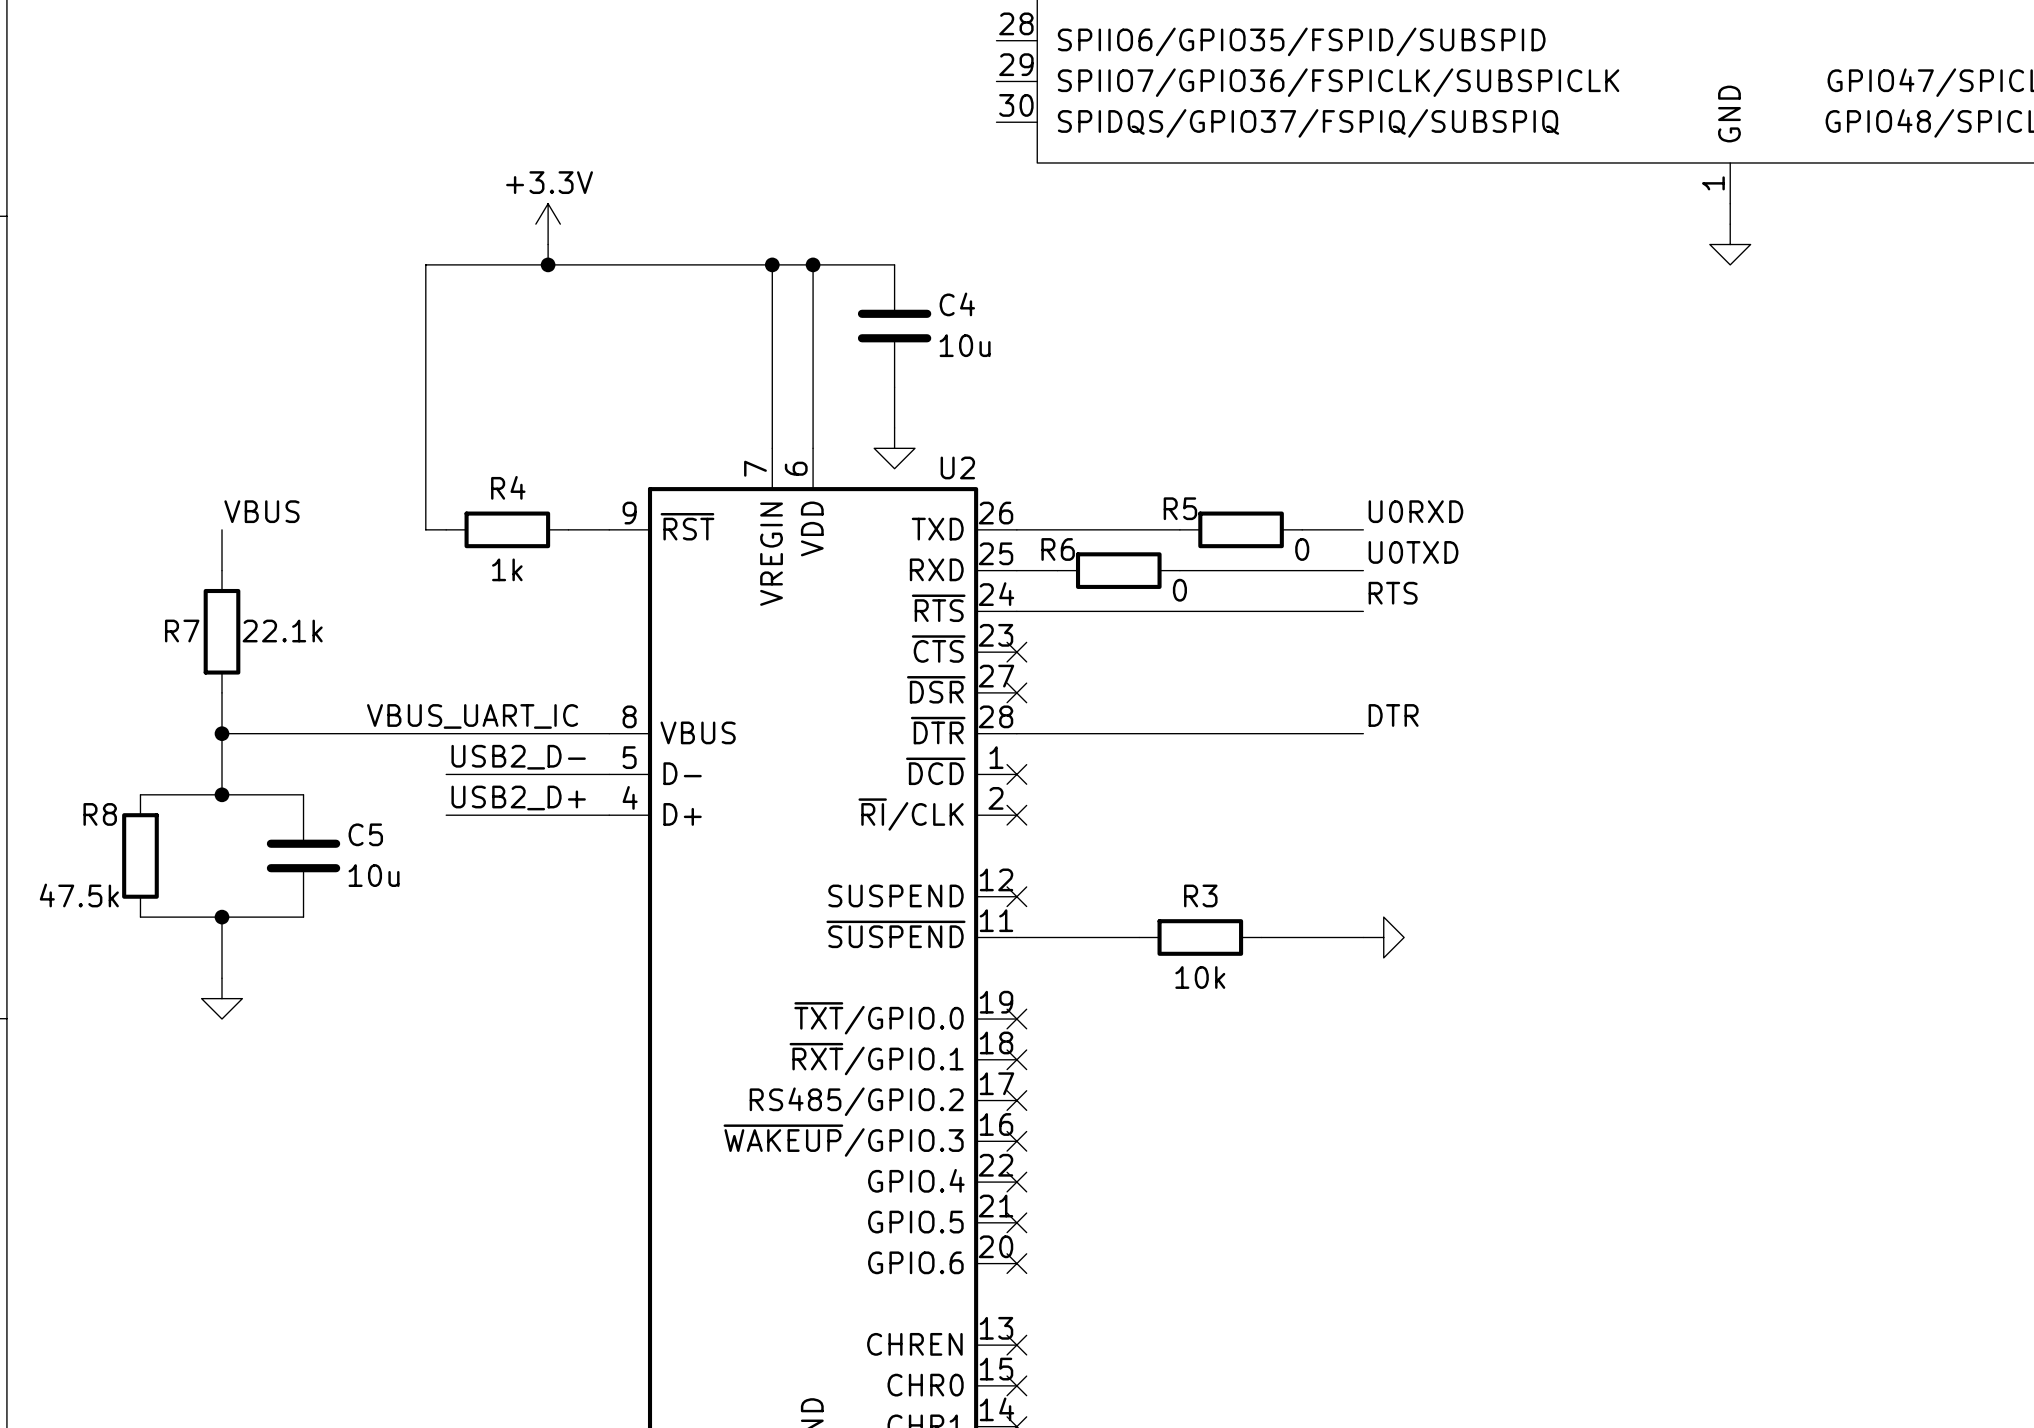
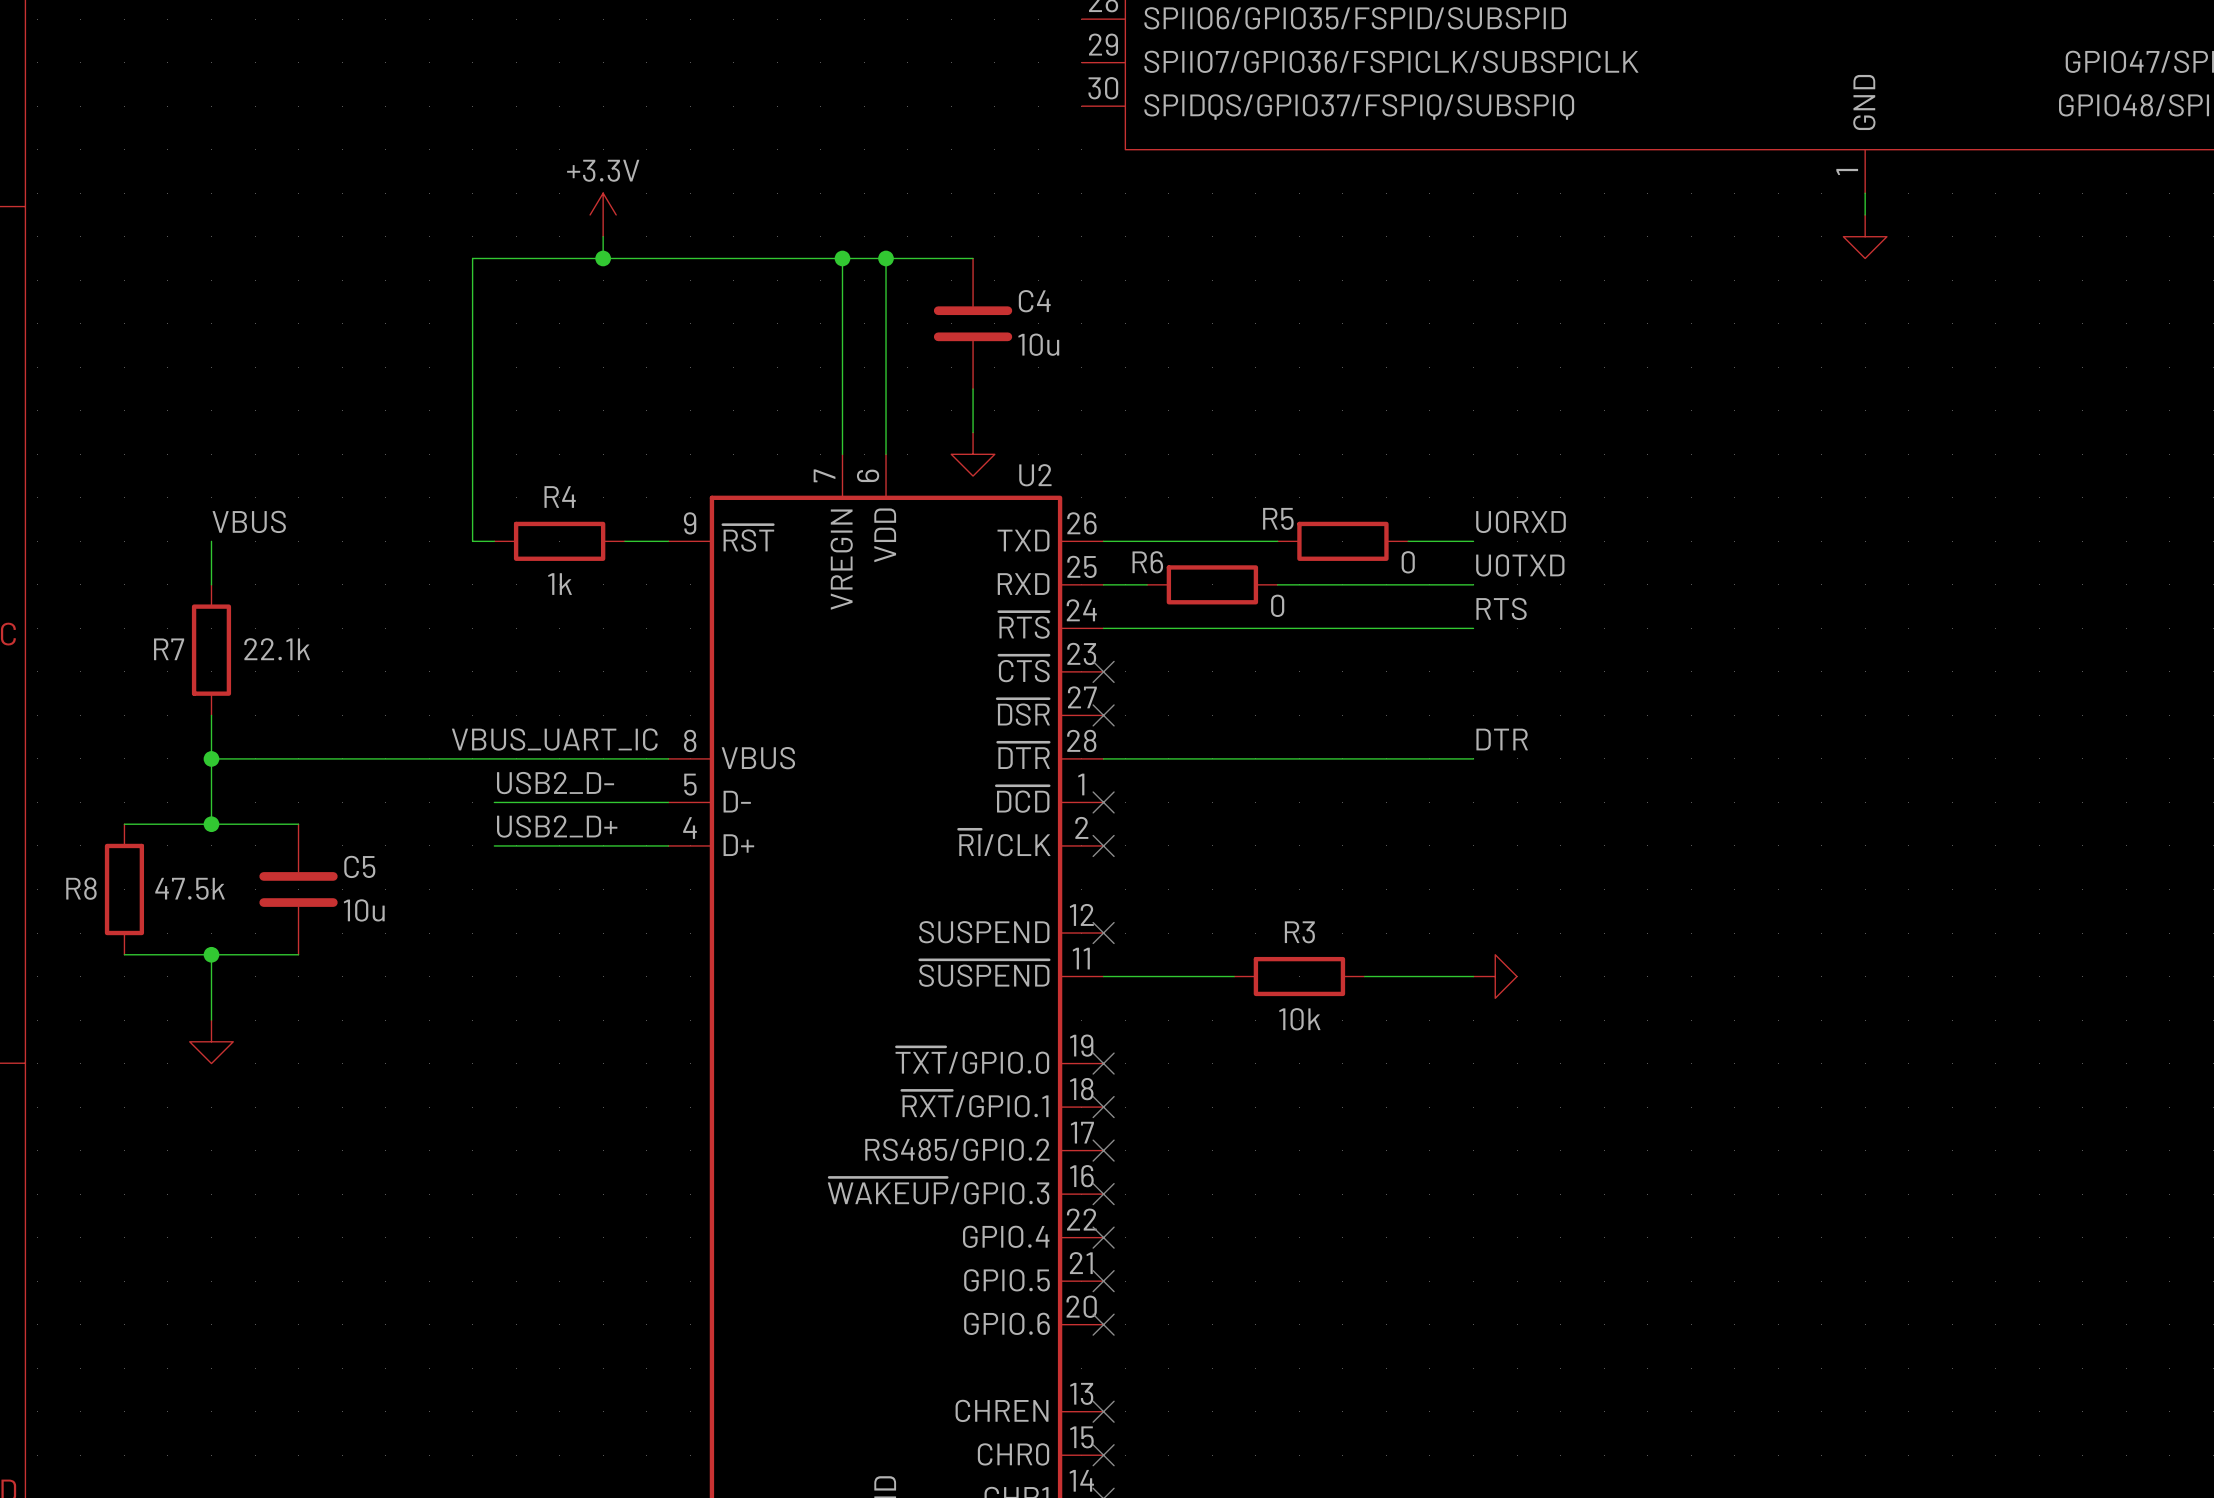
label position: VBUS (261, 511) -> VBUS (249, 521)
wire: (221, 529) (221, 570) -> (211, 541) (211, 584)
R7 position: (221, 631) -> (211, 650)
wire: (221, 692) (221, 794) -> (211, 715) (211, 824)
label position: VBUS_UART_IC (472, 716) -> VBUS_UART_IC (554, 739)
wire: none -> (211, 758) (255, 758)
junction: none -> (211, 758)
junction: (221, 733) -> none
junction: none -> (211, 824)
junction: (221, 794) -> none
wire: (262, 794) (303, 794) -> (124, 824) (167, 824)
R8 name position: R8 (100, 814) -> R8 (81, 888)
R8 position: (140, 855) -> (124, 889)
C5 position: (303, 855) -> (298, 889)
R8 value position: 47.5k (79, 895) -> 47.5k (190, 888)
wire: (221, 917) (221, 978) -> (211, 954) (211, 1020)
junction position: (221, 917) -> (211, 954)
wire: (262, 917) (303, 917) -> (124, 954) (167, 954)
power symbol position: (221, 998) -> (211, 1041)

